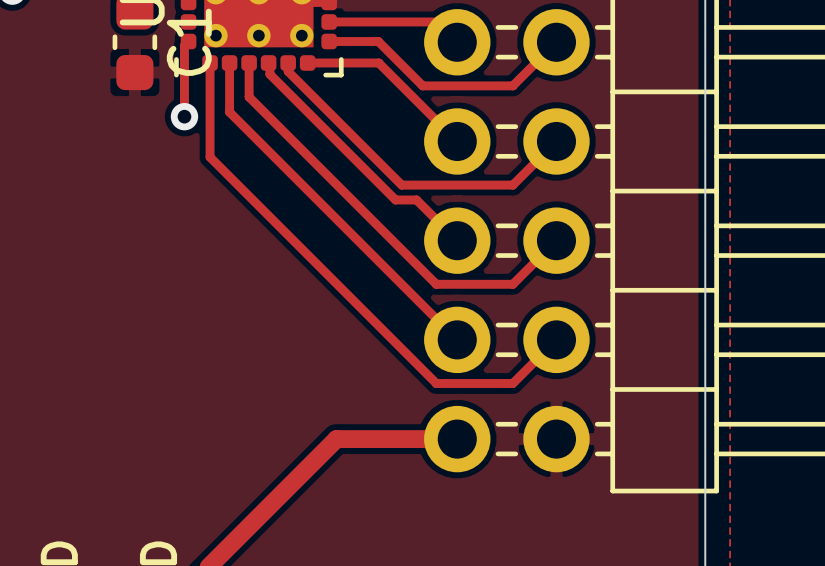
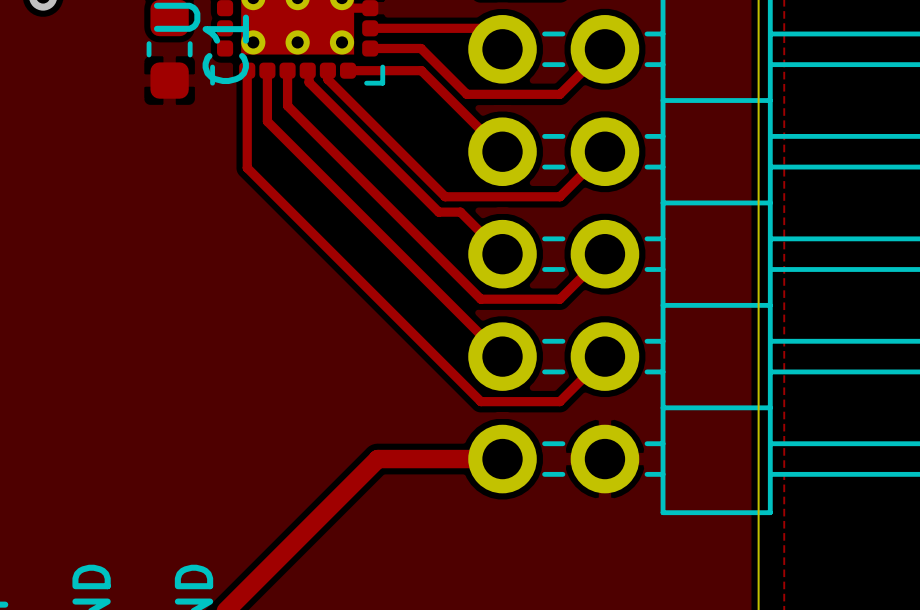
track: (188, 41) (184, 45) (184, 116) -> none
via: (184, 116) -> none

